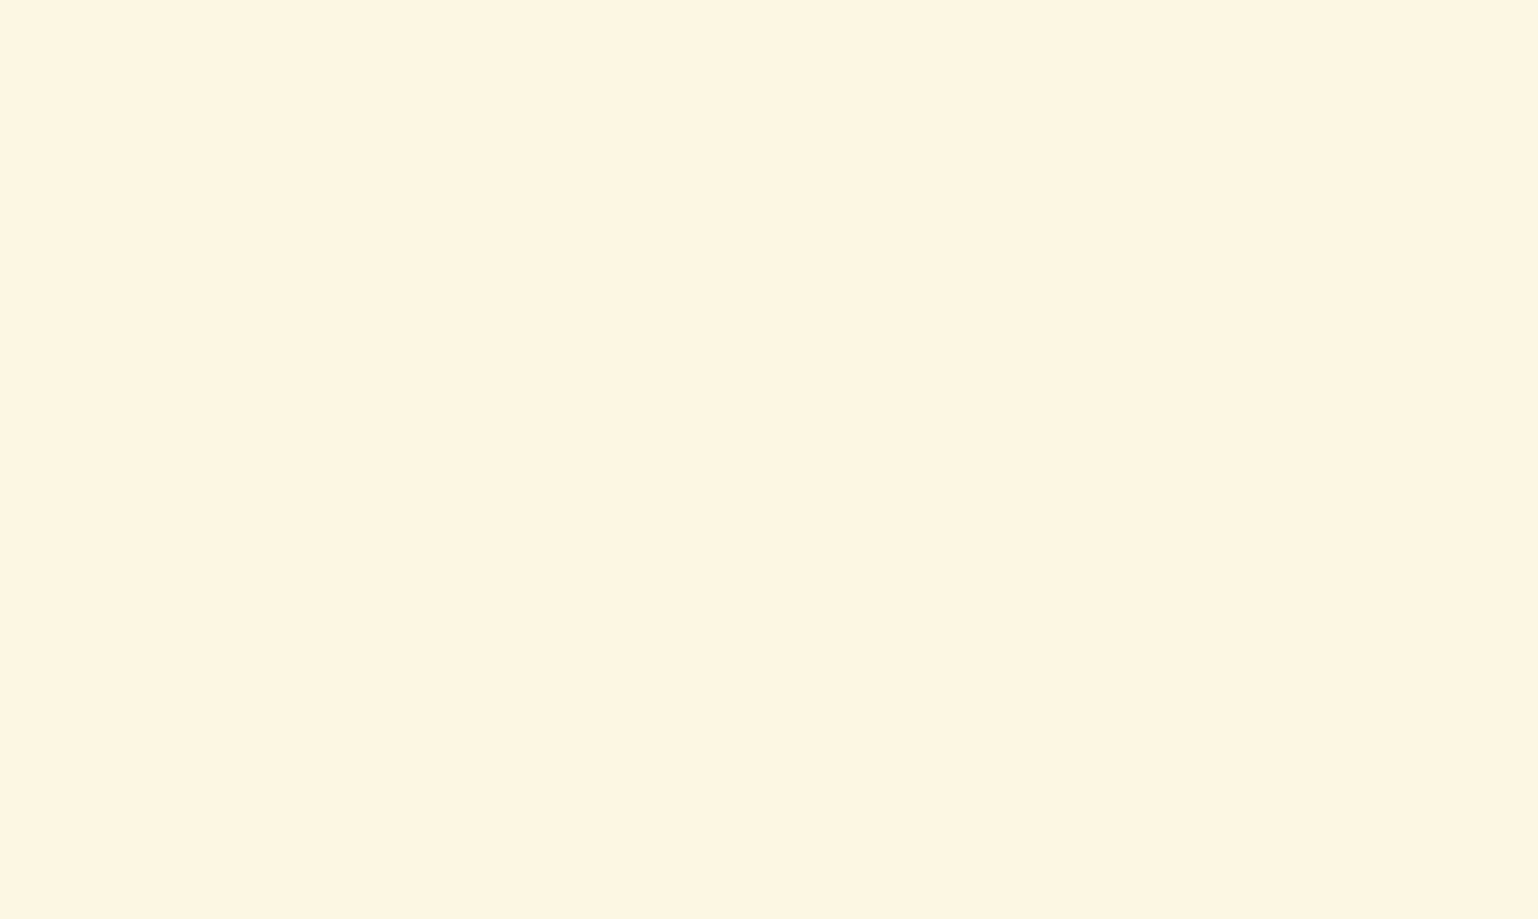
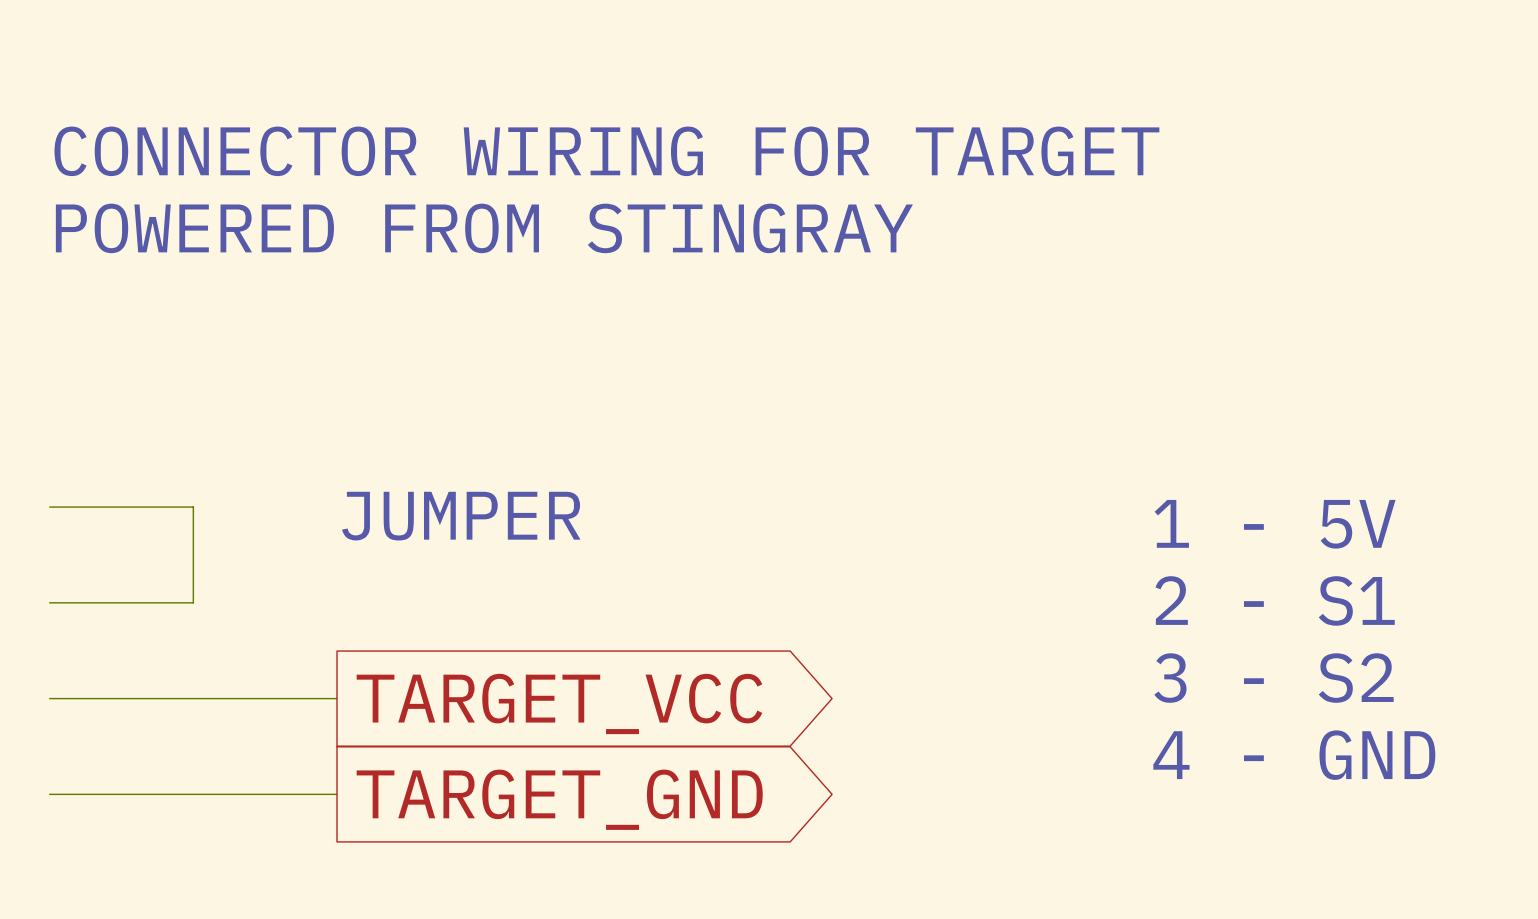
text: none -> CONNECTOR WIRING FOR TARGET (606, 151)
text: none -> POWERED FROM STINGRAY (484, 228)
wire: none -> (49, 507) (193, 507) (193, 602) (49, 602)
text: none -> JUMPER (461, 516)
text: none -> 1 - 5V (1275, 524)
text: none -> 2 - S1 (1275, 600)
text: none -> 3 - S2 (1273, 678)
wire: none -> (49, 698) (336, 698)
global label: none -> TARGET_VCC (559, 703)
text: none -> 4 - GND (1294, 755)
wire: none -> (49, 794) (336, 794)
global label: none -> TARGET_GND (559, 799)

